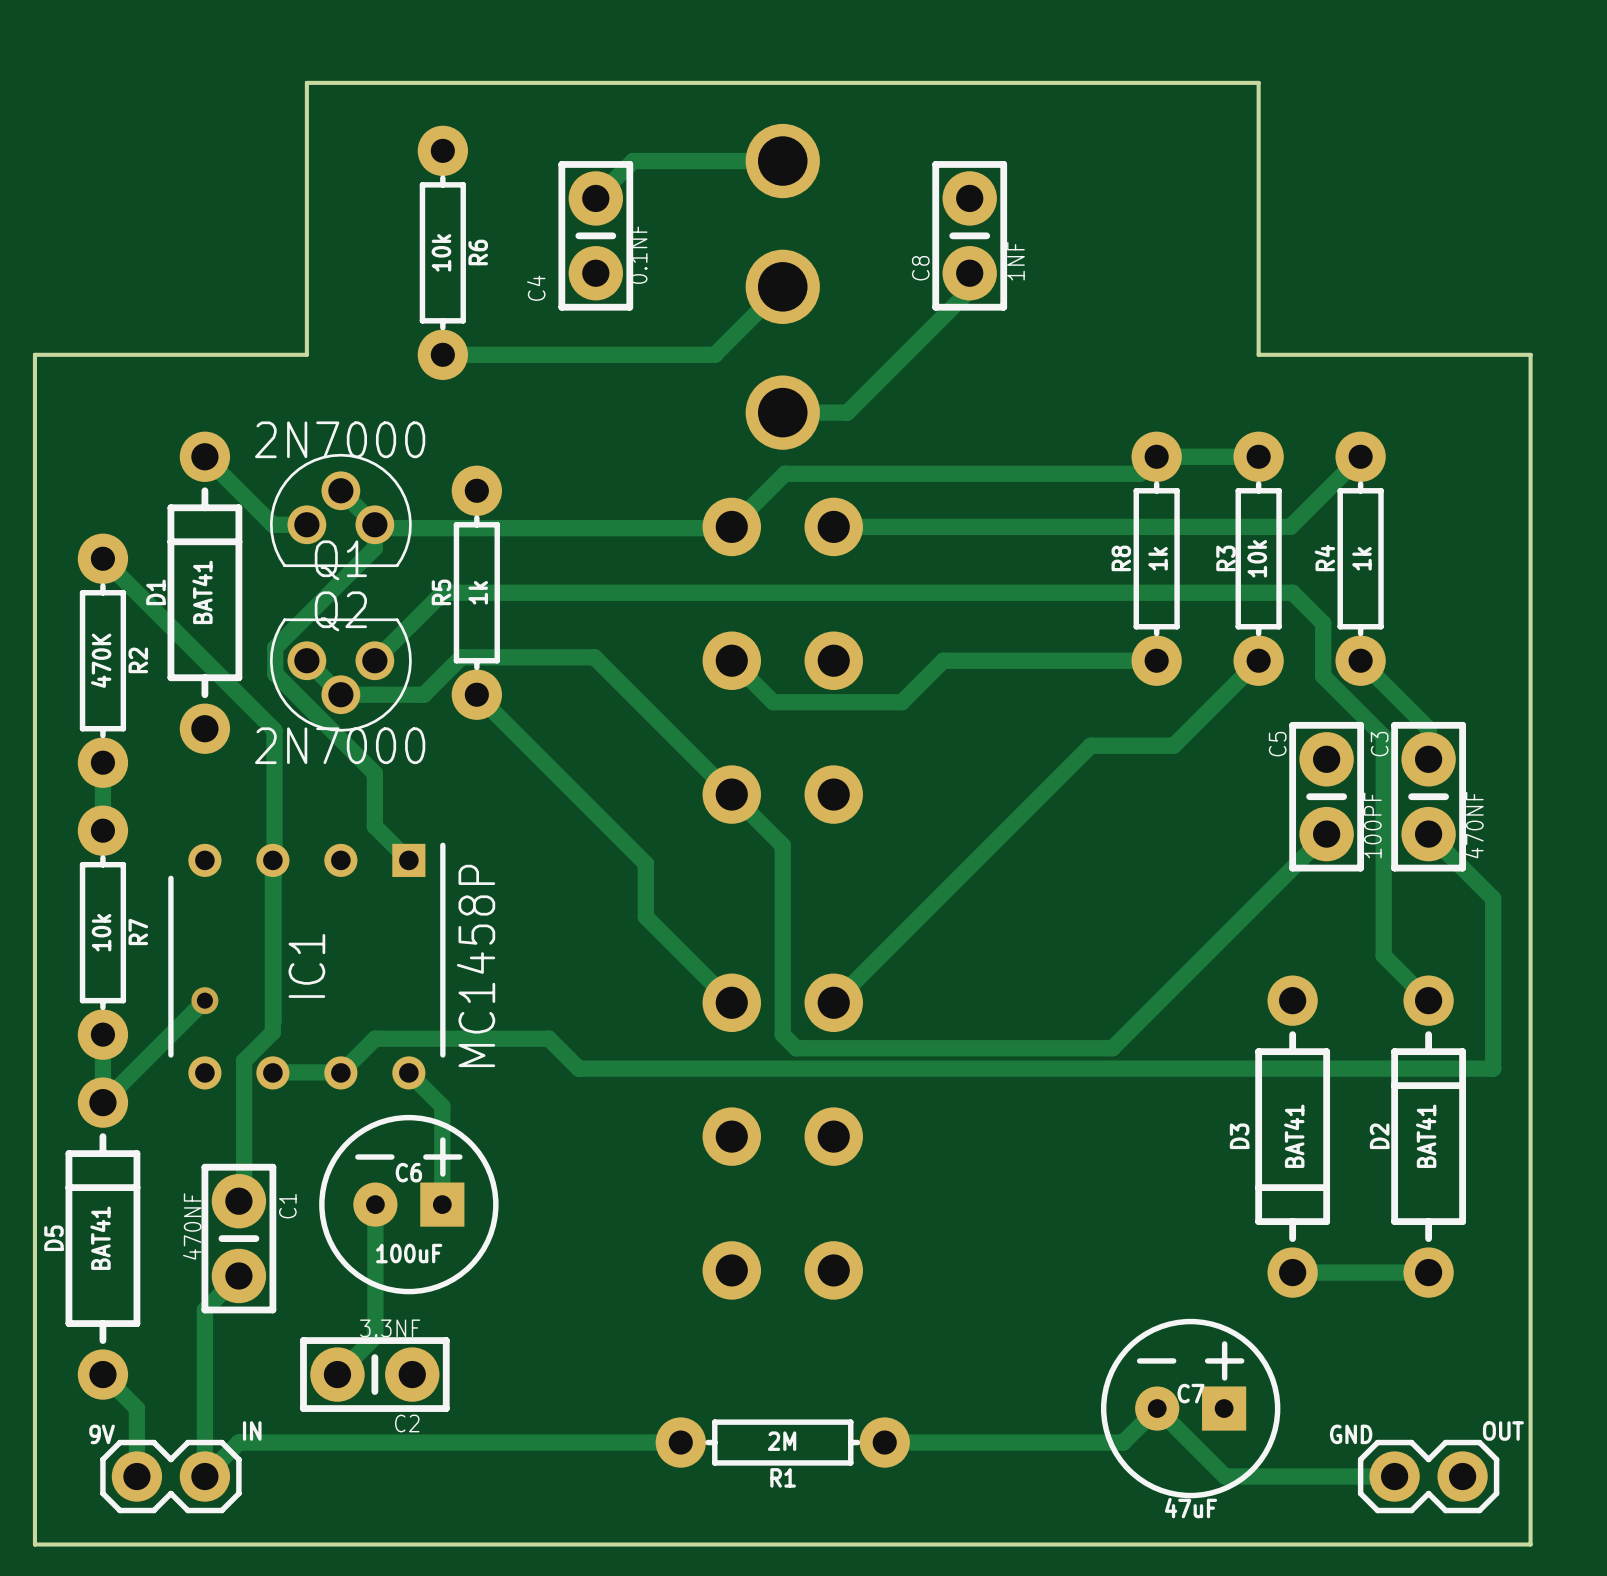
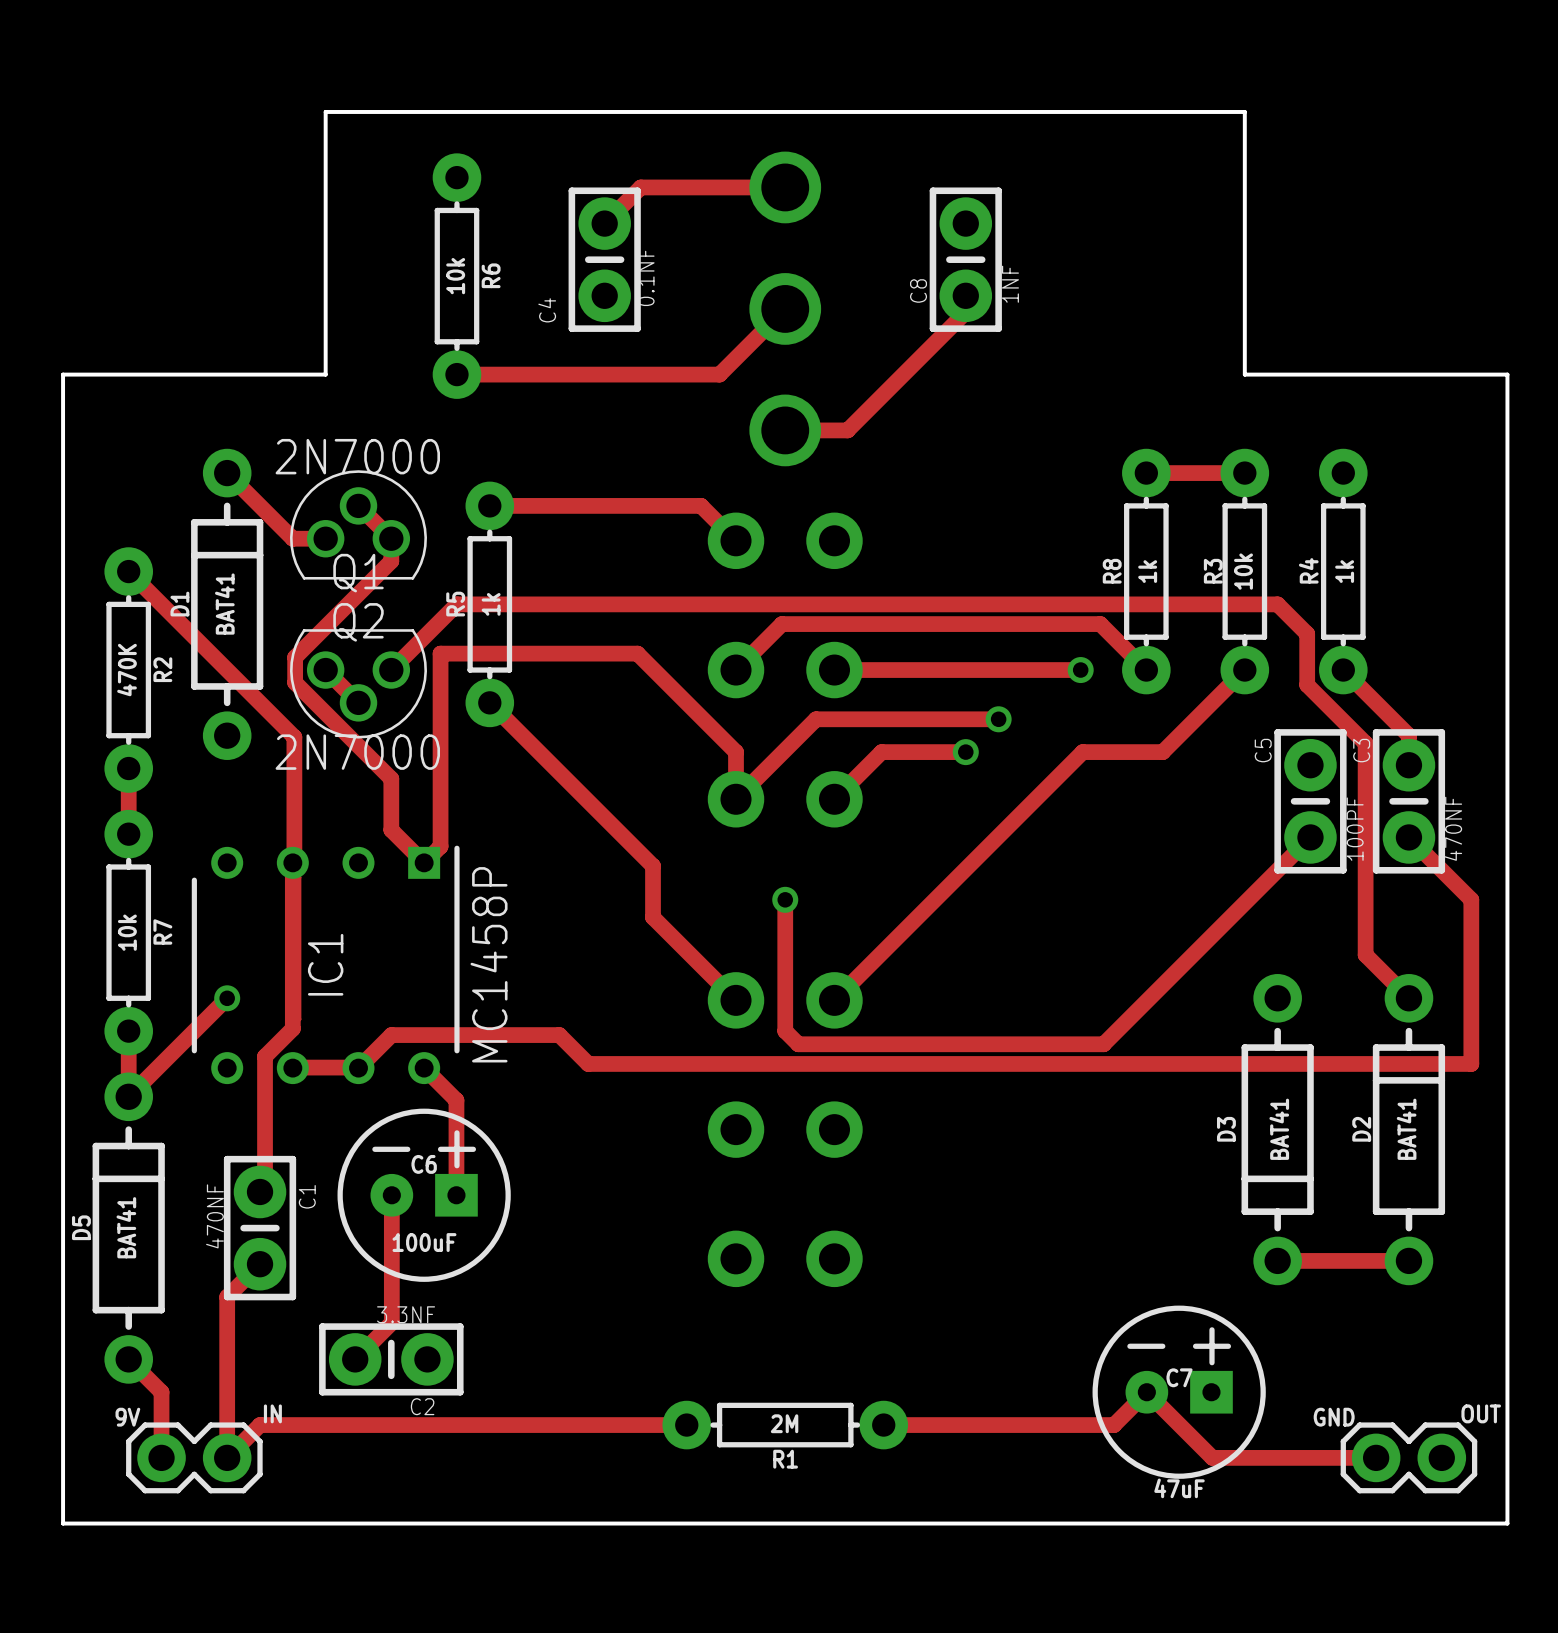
track: (1156, 456) (1139, 473) (784, 473) (730, 528) (378, 528) (374, 524) -> none
track: (1360, 456) (1290, 526) (833, 526) -> none
track: none -> (489, 505) (701, 505) (736, 540)
track: (731, 660) (773, 702) (901, 702) (943, 660) -> (834, 670) (940, 670)
track: (1088, 660) (1156, 660) -> (736, 670) (781, 624) (1100, 624) (1146, 670)
via: none -> (1080, 670)
track: (340, 694) (423, 694) (461, 657) (594, 657) (782, 845) (782, 898) -> none
track: none -> (998, 719) (816, 719) (736, 799) (736, 752) (637, 653) (440, 653) (440, 846) (424, 862)
via: none -> (998, 719)
track: none -> (965, 752) (881, 752) (834, 799)
via: none -> (965, 752)
via: none -> (785, 899)

